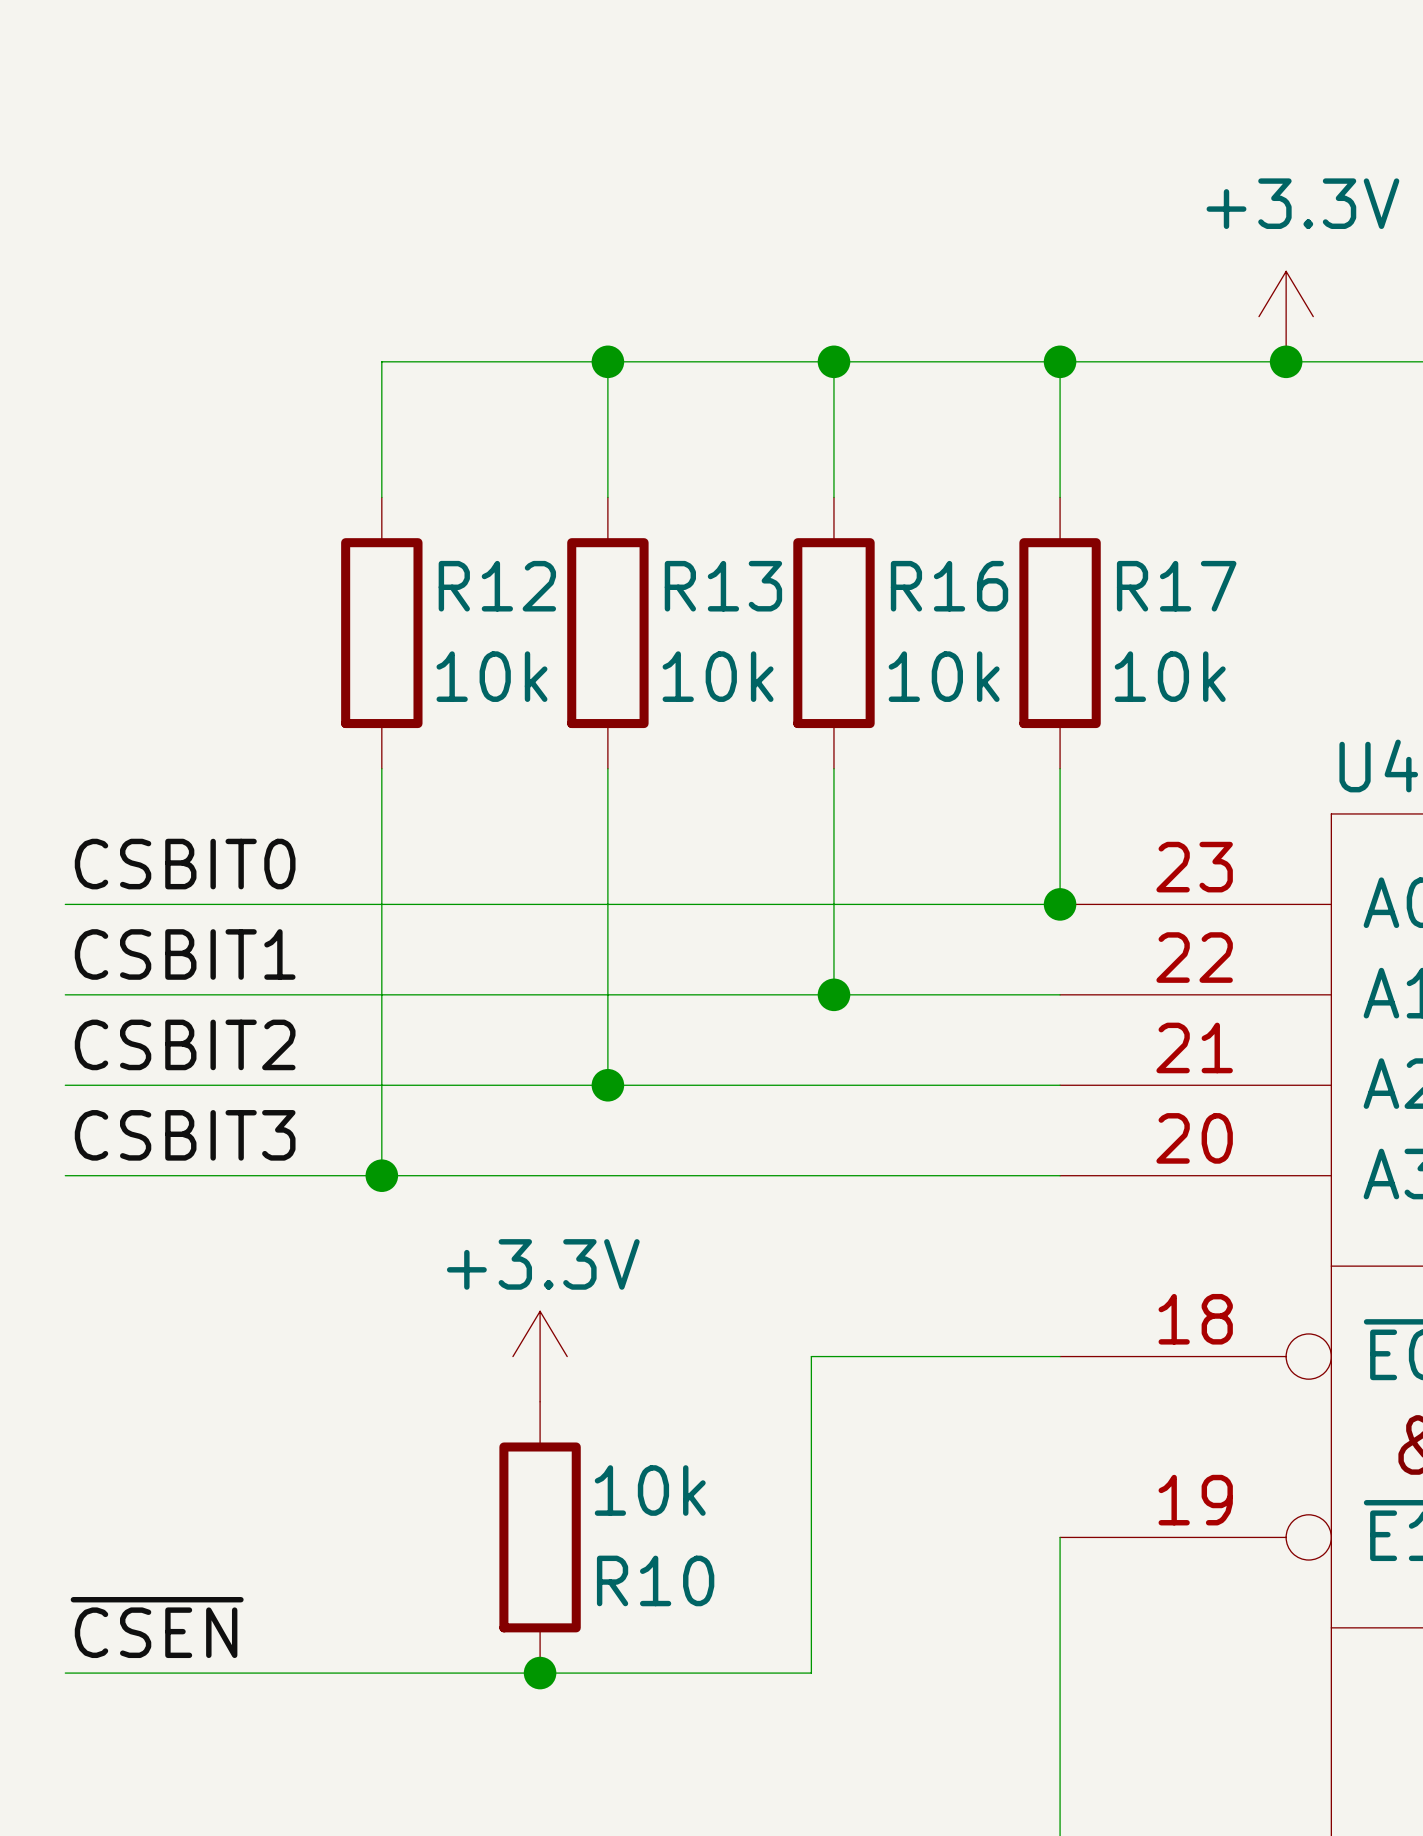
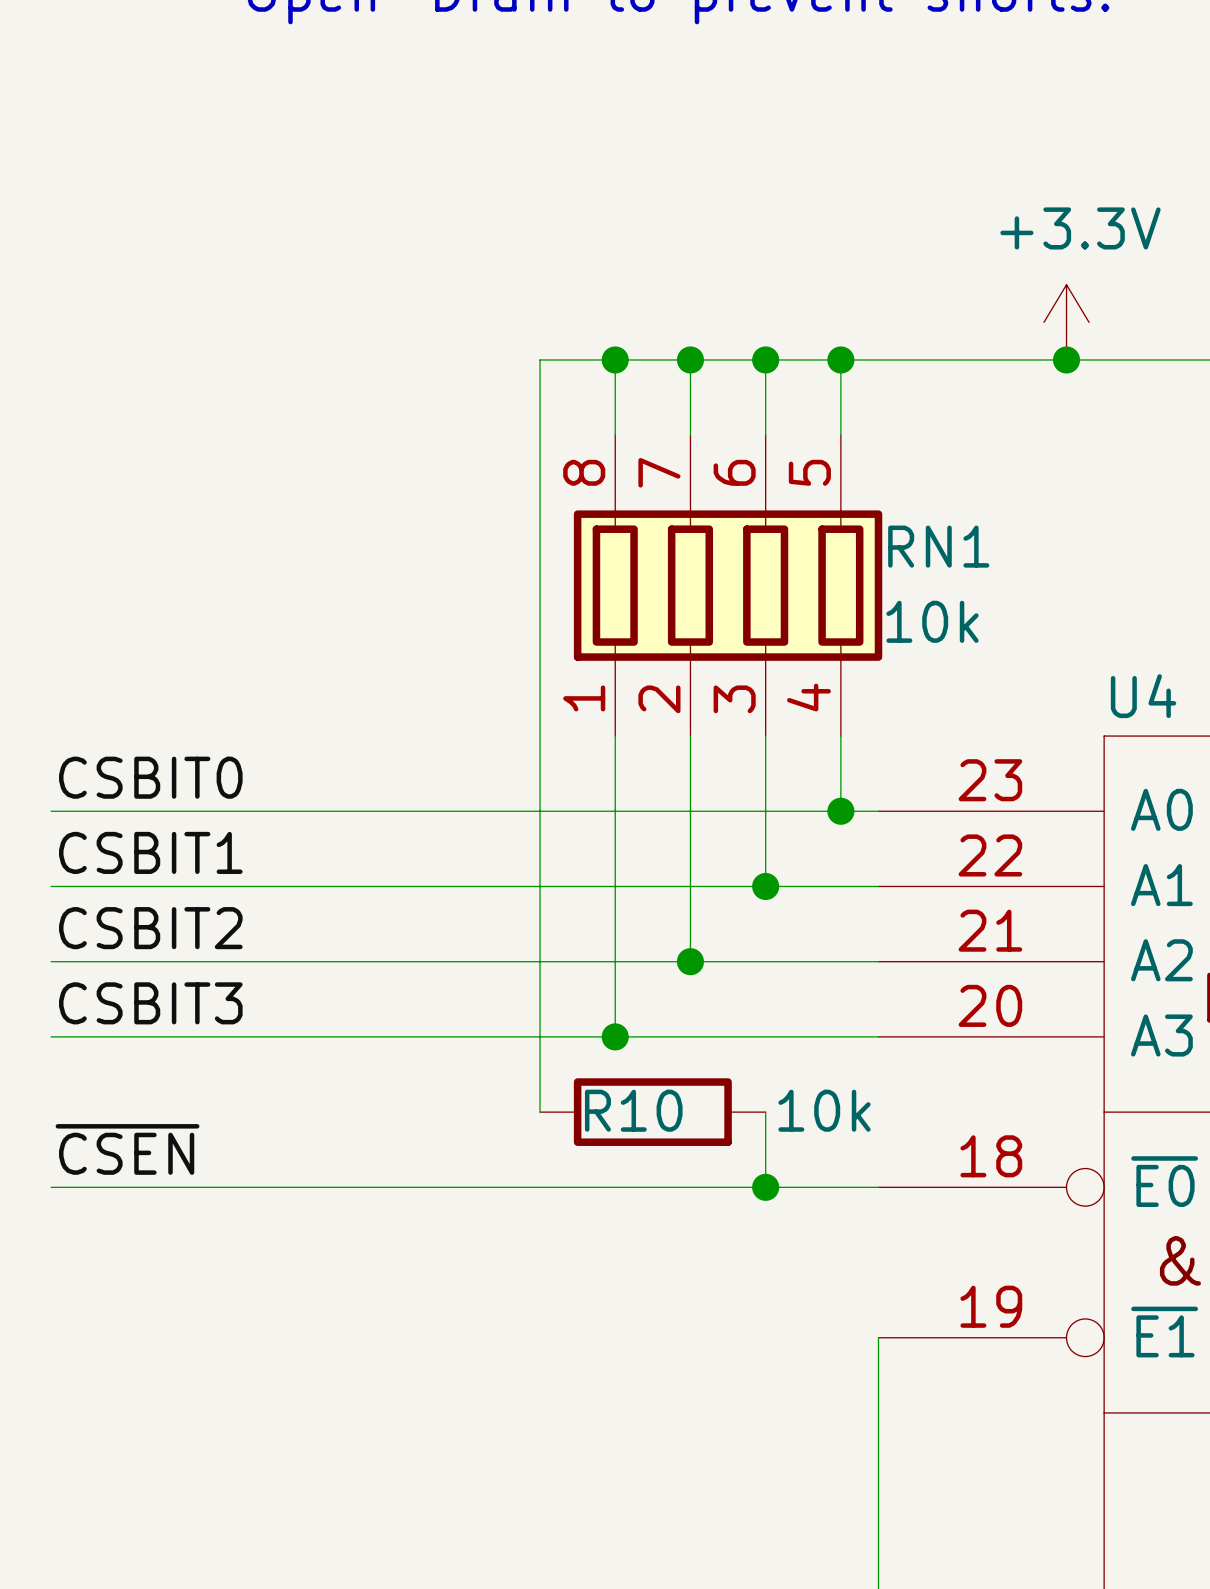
wire: (607, 361) (607, 497) -> none
junction position: (607, 361) -> (615, 359)
wire: (653, 361) (381, 361) (381, 497) -> (540, 359) (540, 1112)
wire: none -> (615, 359) (615, 435)
wire: none -> (765, 359) (765, 435)
junction: none -> (765, 359)
wire: none -> (840, 359) (840, 435)
wire: (1060, 361) (1060, 497) -> none
junction position: (1060, 361) -> (840, 359)
R12: 10k (381, 633) -> none
R13: 10k (607, 633) -> none
R16: 10k (833, 633) -> none
RN1: none -> 10k (728, 585)
R17: 10k (1060, 633) -> none
wire: (381, 768) (381, 1175) -> none
wire: (607, 768) (607, 1085) -> none
wire: (1060, 768) (1060, 904) -> none
wire: none -> (615, 736) (615, 1036)
wire: none -> (765, 736) (765, 886)
wire: none -> (840, 736) (840, 811)
junction position: (1060, 904) -> (840, 811)
wire: none -> (690, 886) (690, 961)
junction: (833, 994) -> none
junction: none -> (765, 886)
junction: (607, 1085) -> none
junction: none -> (690, 961)
junction: (381, 1175) -> none
junction: none -> (615, 1036)
wire: none -> (765, 1112) (765, 1187)
power symbol: +3.3V (540, 1356) -> none
wire: (811, 1356) (811, 1673) (65, 1673) -> (671, 1187) (51, 1187)
junction: none -> (765, 1187)
R10 value position: 10k (650, 1490) -> 10k (824, 1110)
R10 rotation: 0° (540, 1537) -> 90° clockwise (652, 1112)
R10 position: (540, 1537) -> (652, 1112)
R10 name position: R10 (655, 1580) -> R10 (633, 1110)
label position: ~{CSEN} (157, 1627) -> ~{CSEN} (127, 1149)
junction: (540, 1673) -> none

